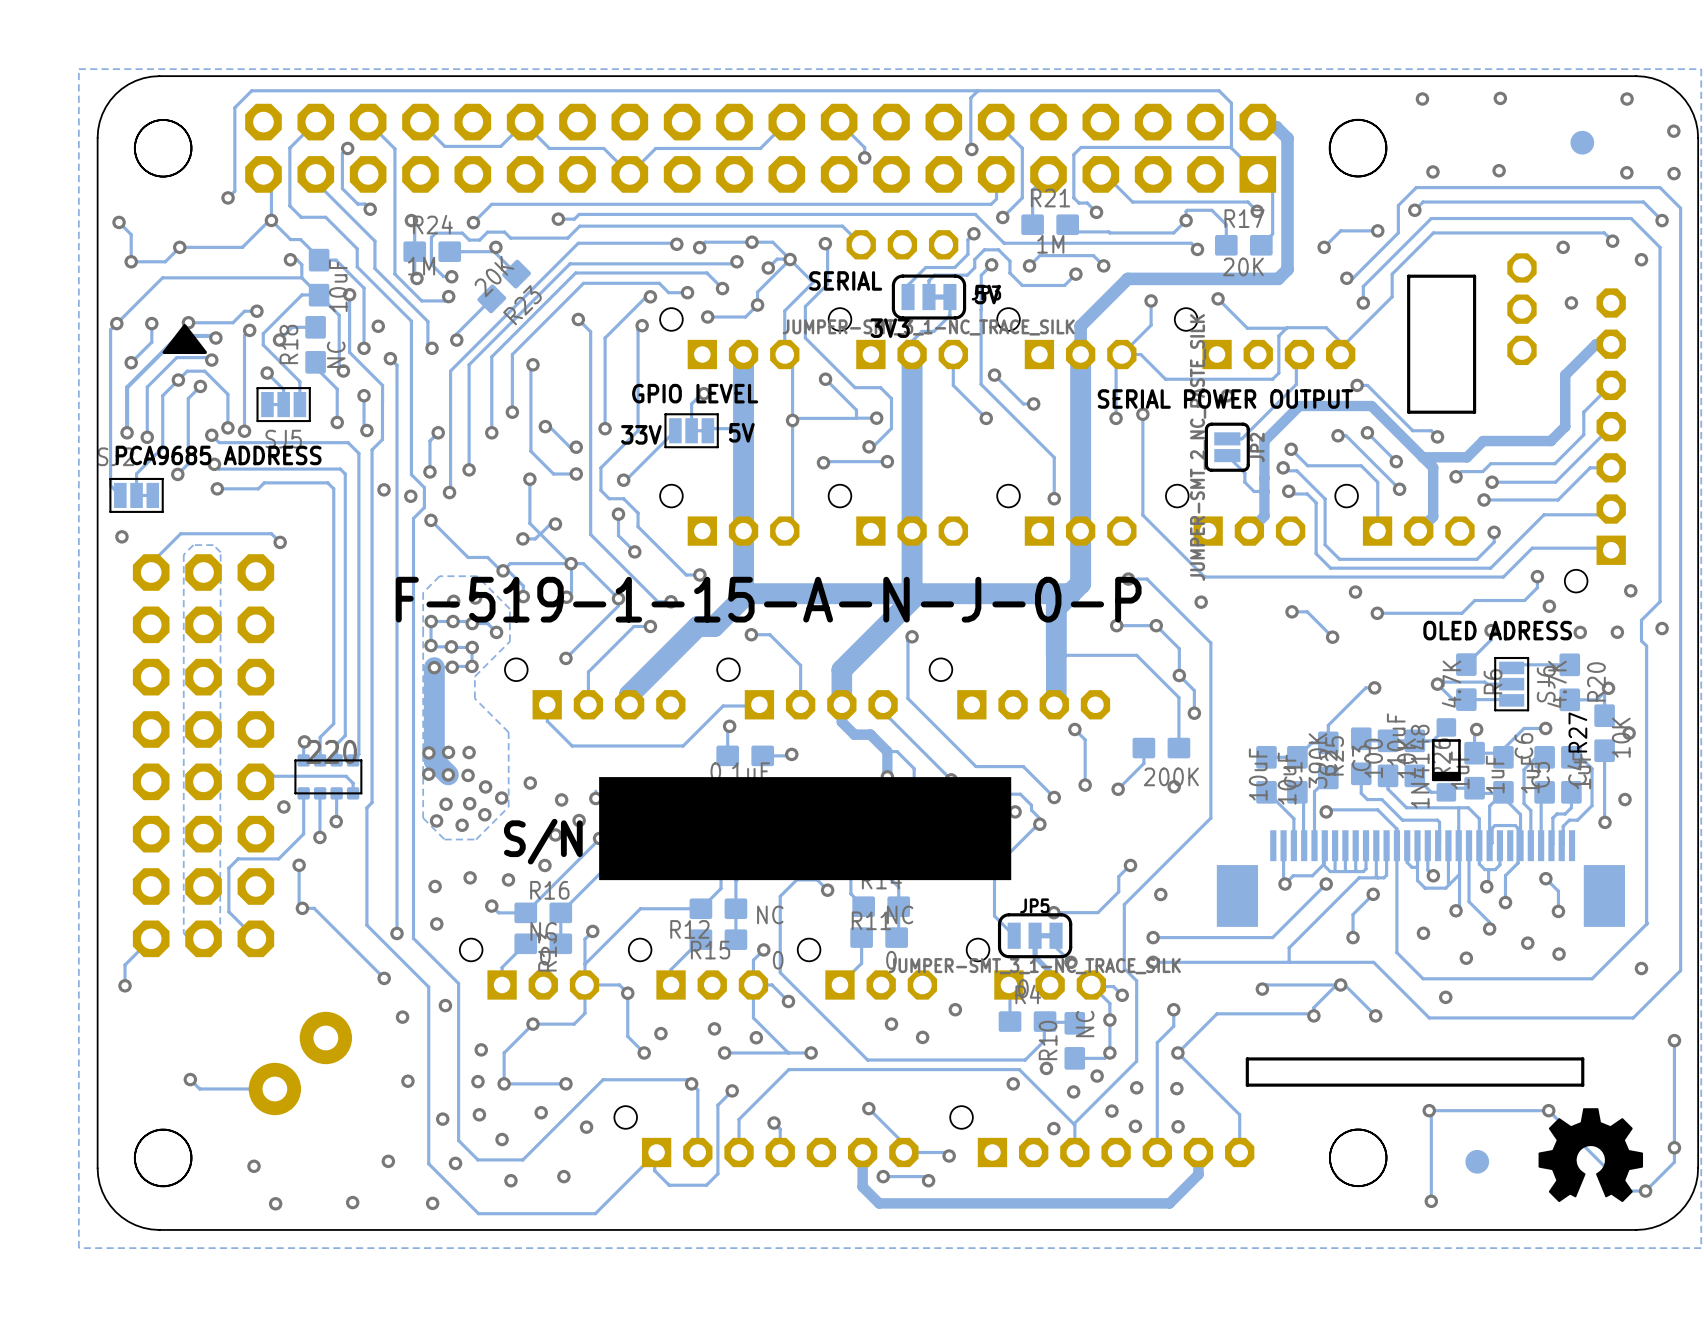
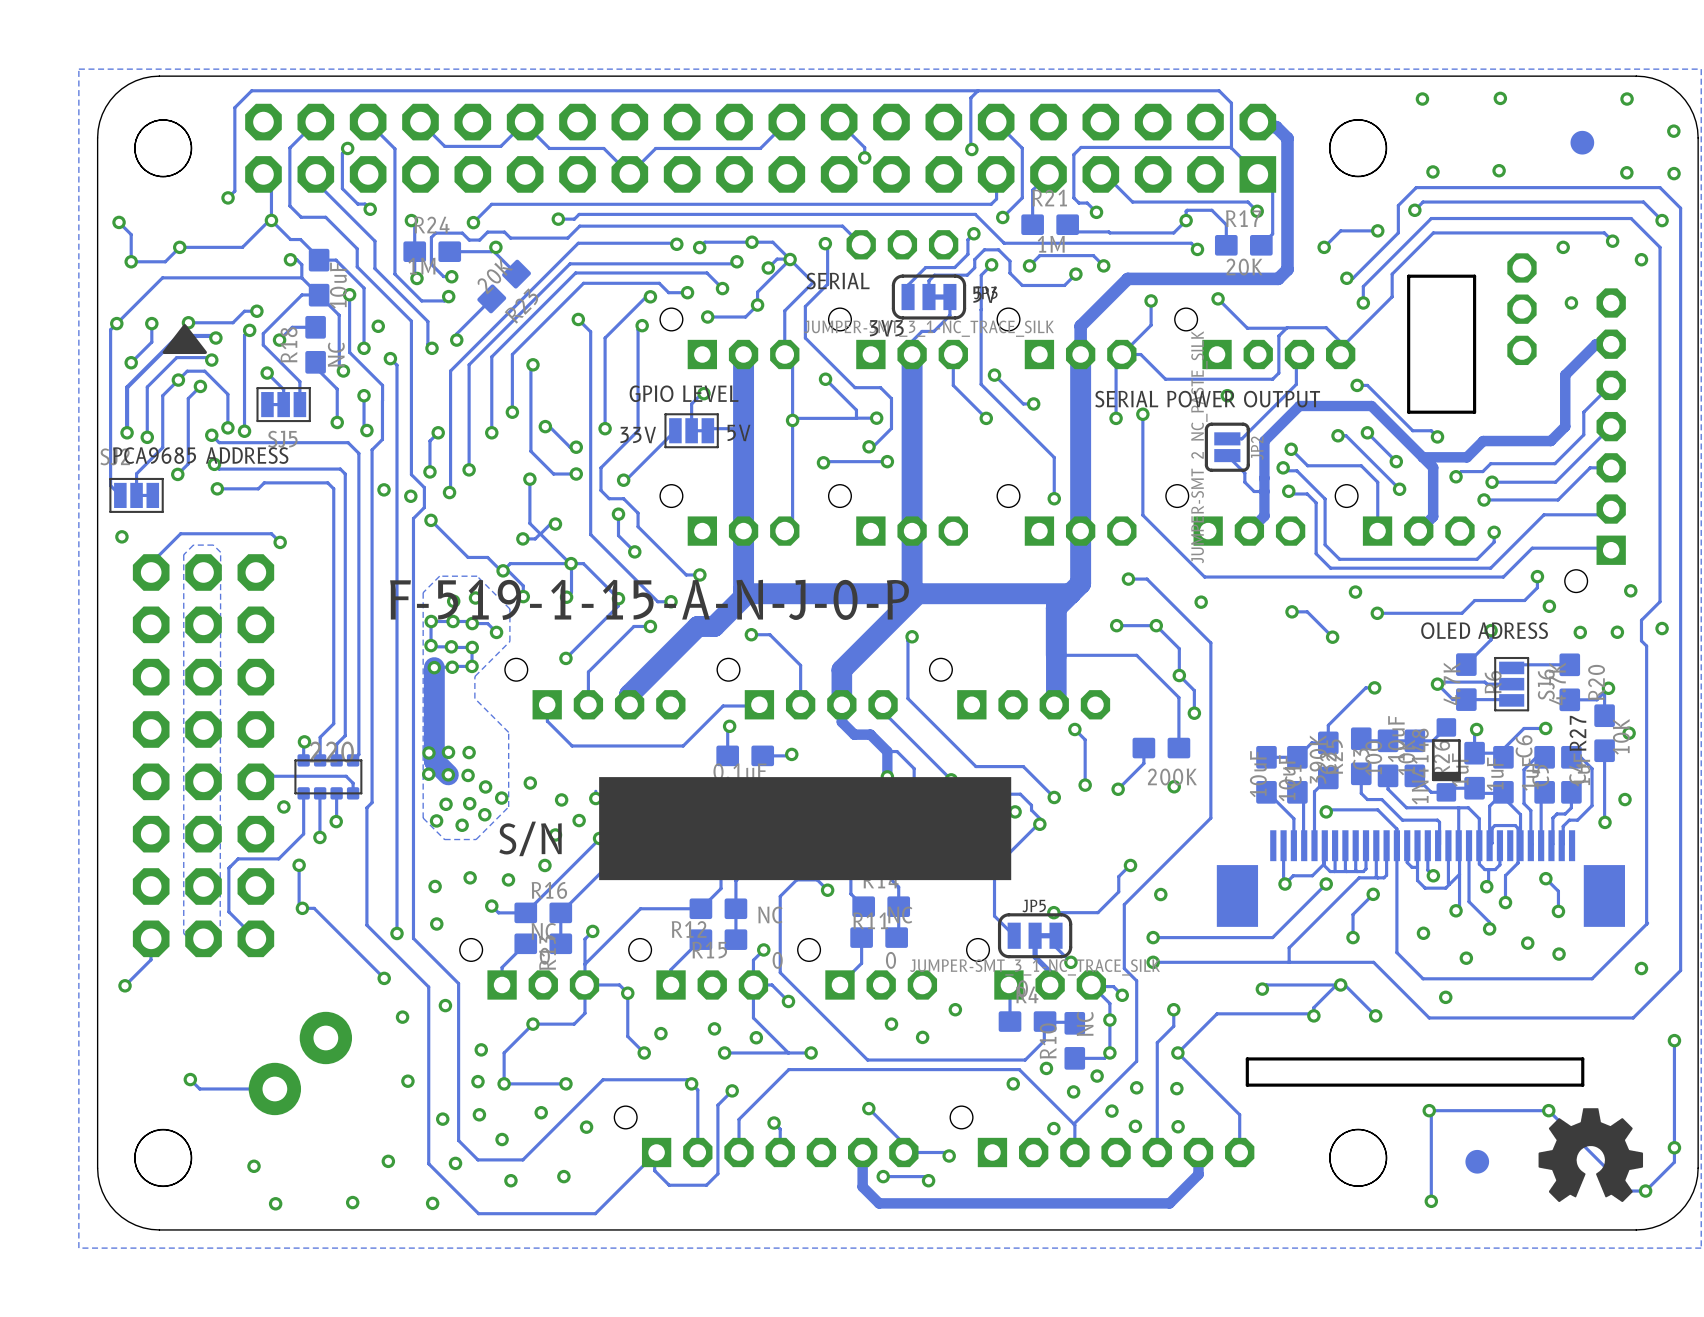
track: (151, 938) (125, 965) (125, 985) -> (150, 936) (150, 959) (125, 985)

